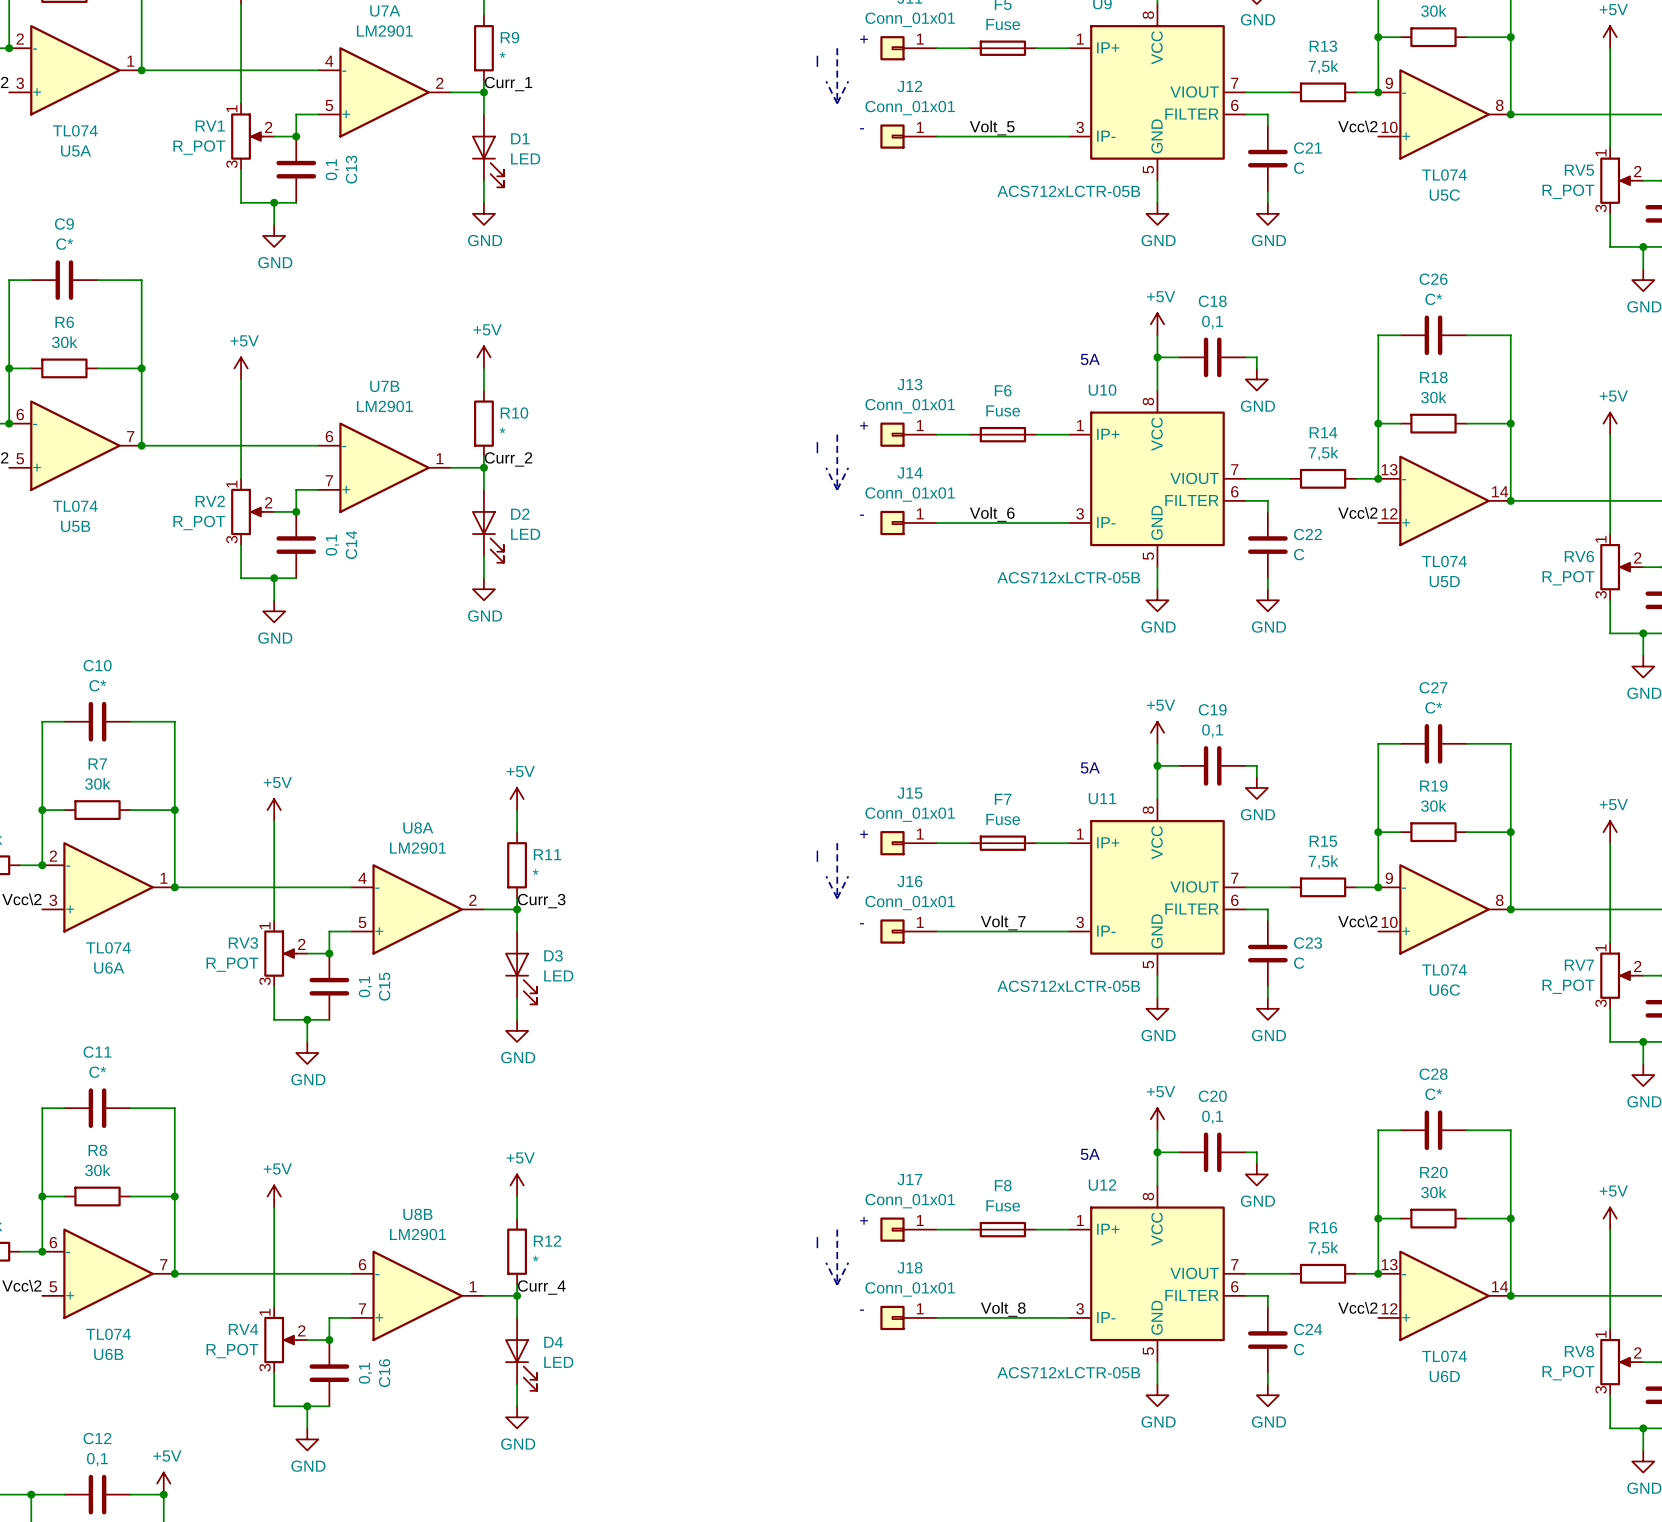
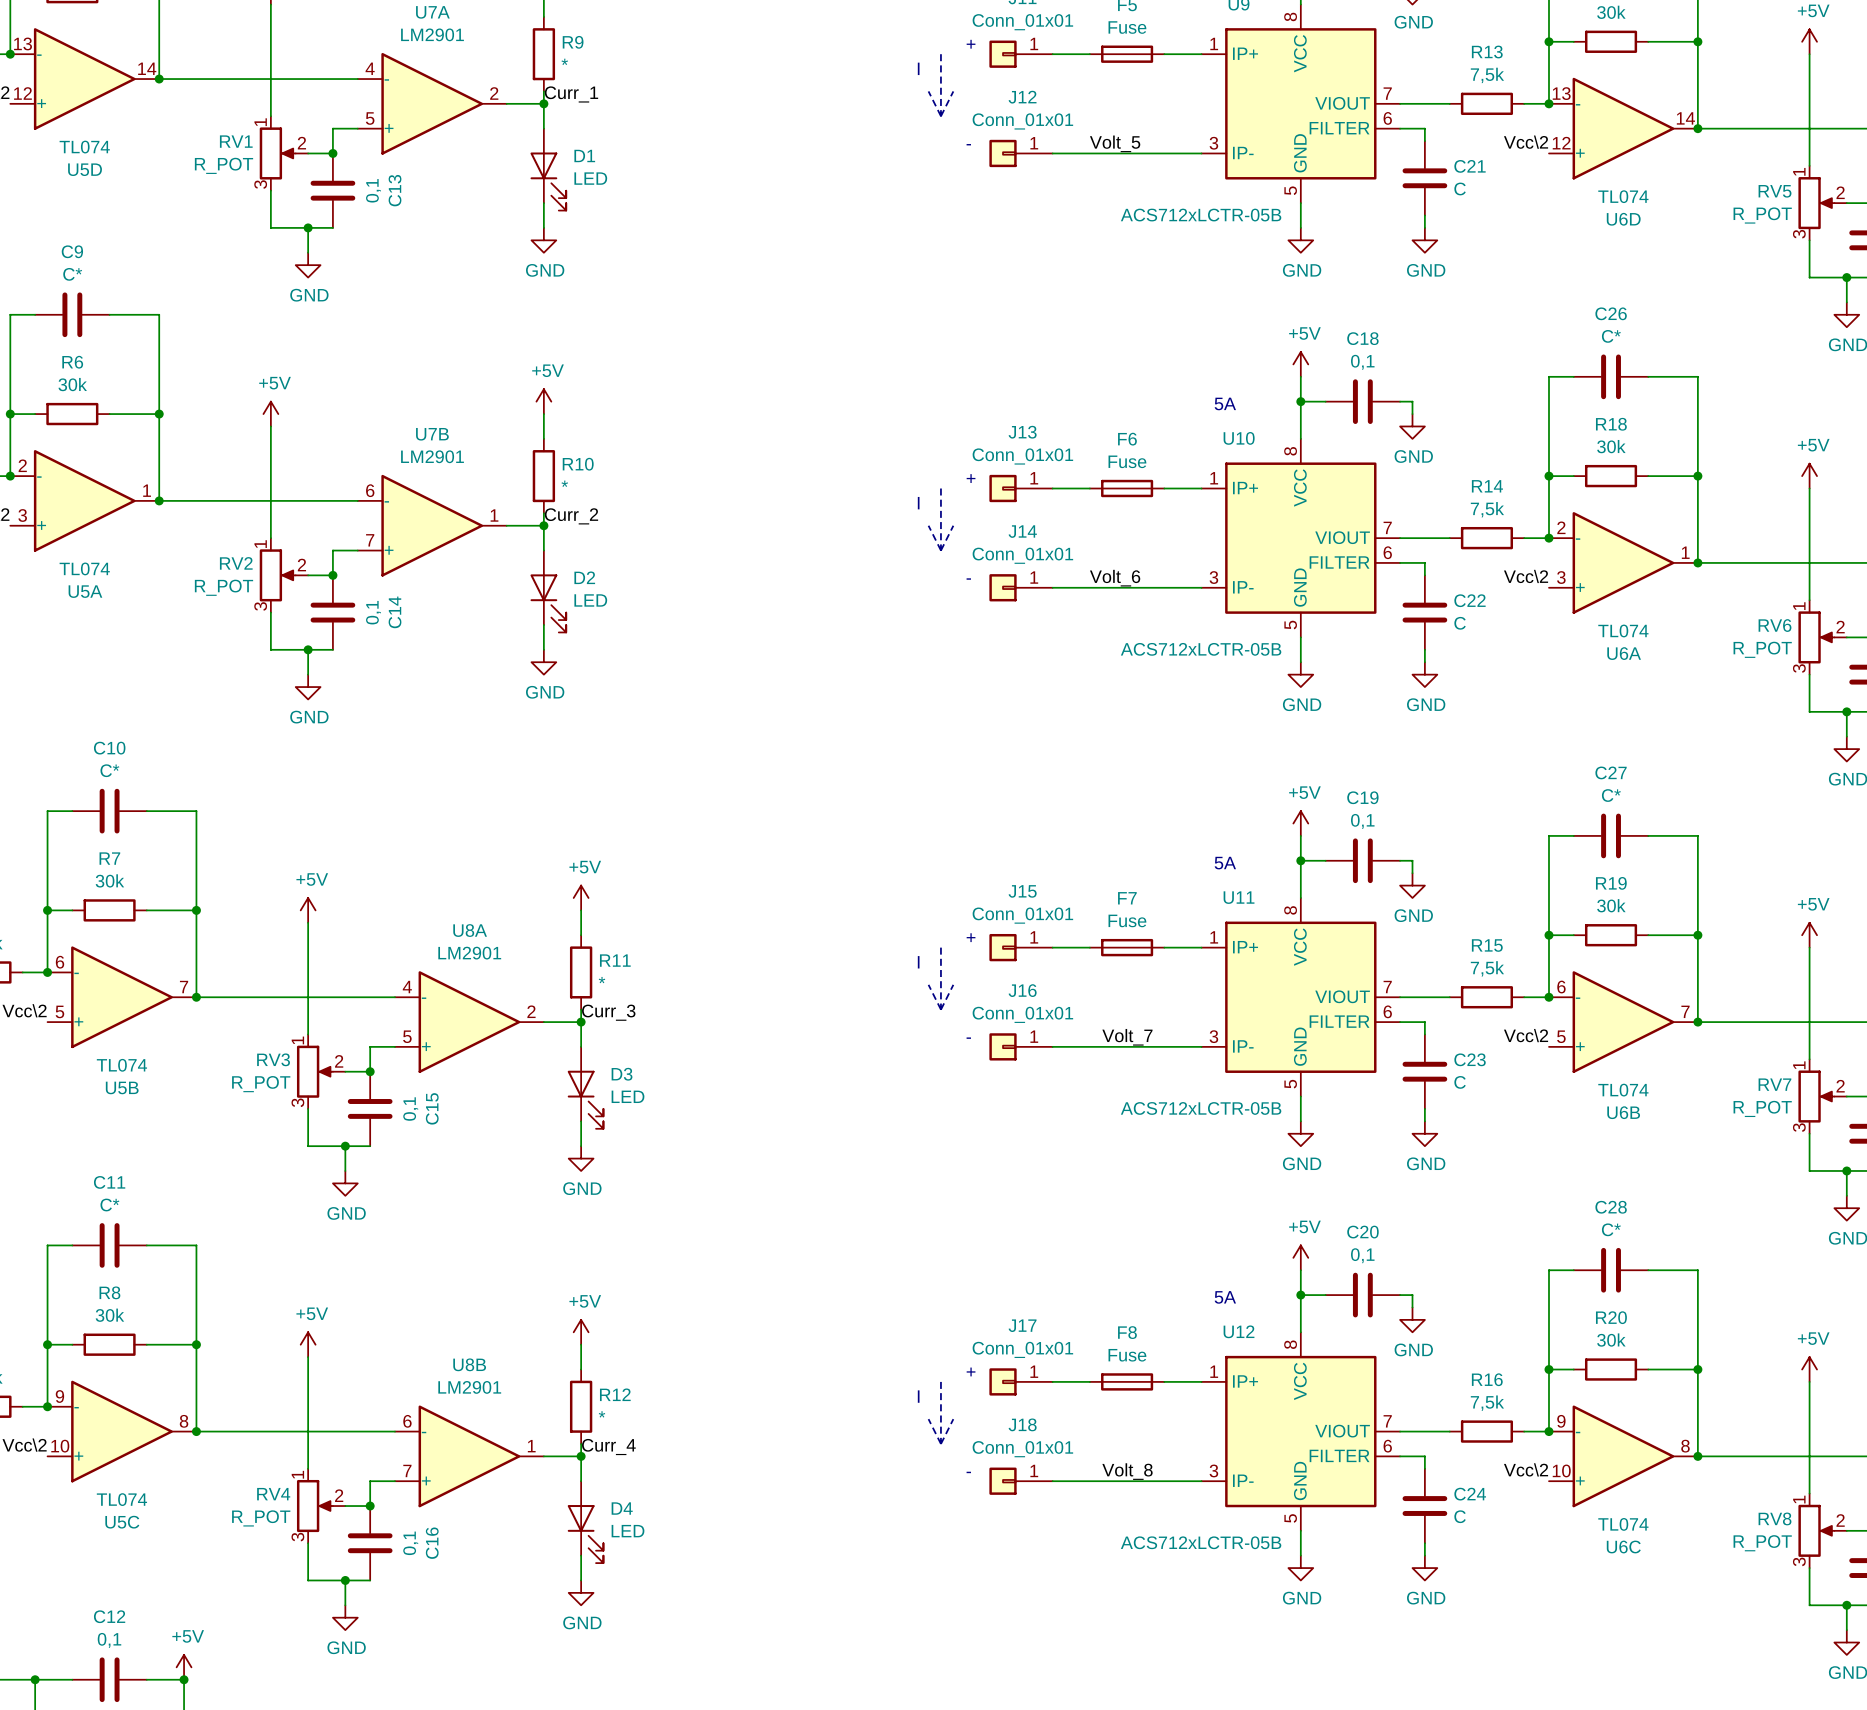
U5A position: (75, 70) -> (84, 500)
U5C position: (1444, 114) -> (121, 1431)
U5B position: (75, 445) -> (121, 997)
U5D position: (1444, 500) -> (84, 79)
U6A position: (108, 887) -> (1623, 562)
U6C position: (1444, 909) -> (1623, 1456)
U6B position: (108, 1273) -> (1623, 1022)
U6D position: (1444, 1295) -> (1623, 128)

